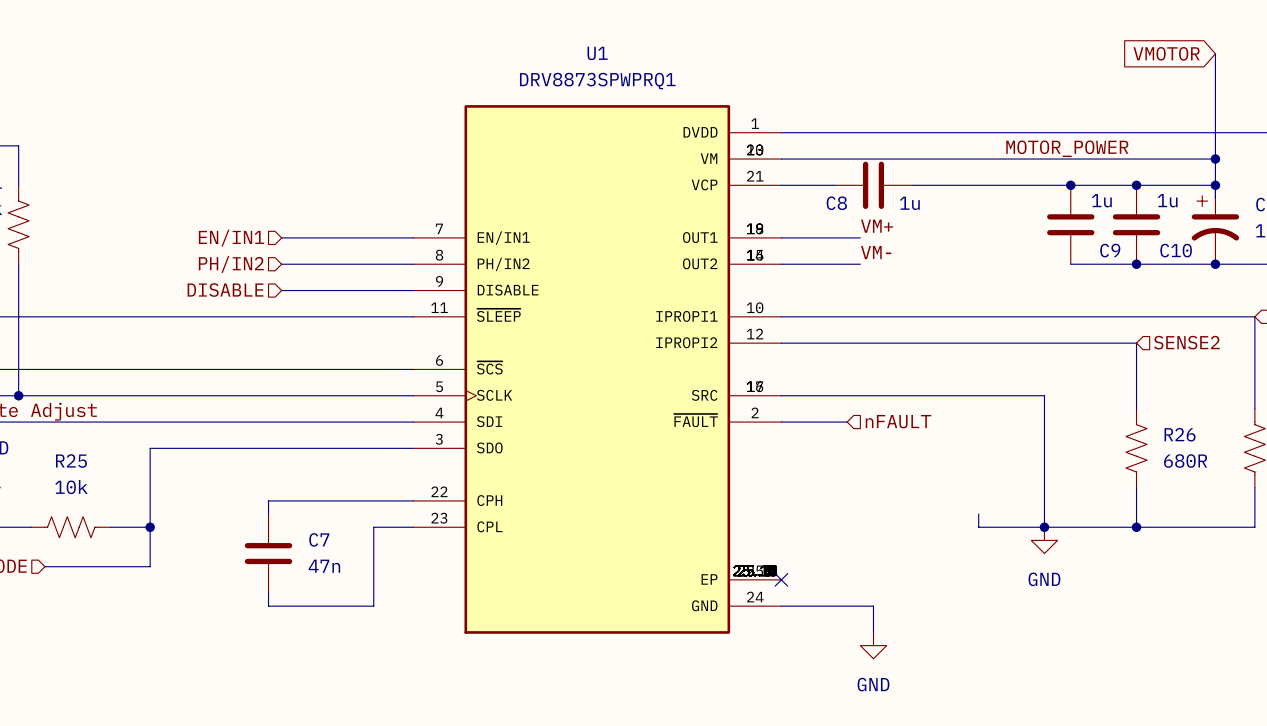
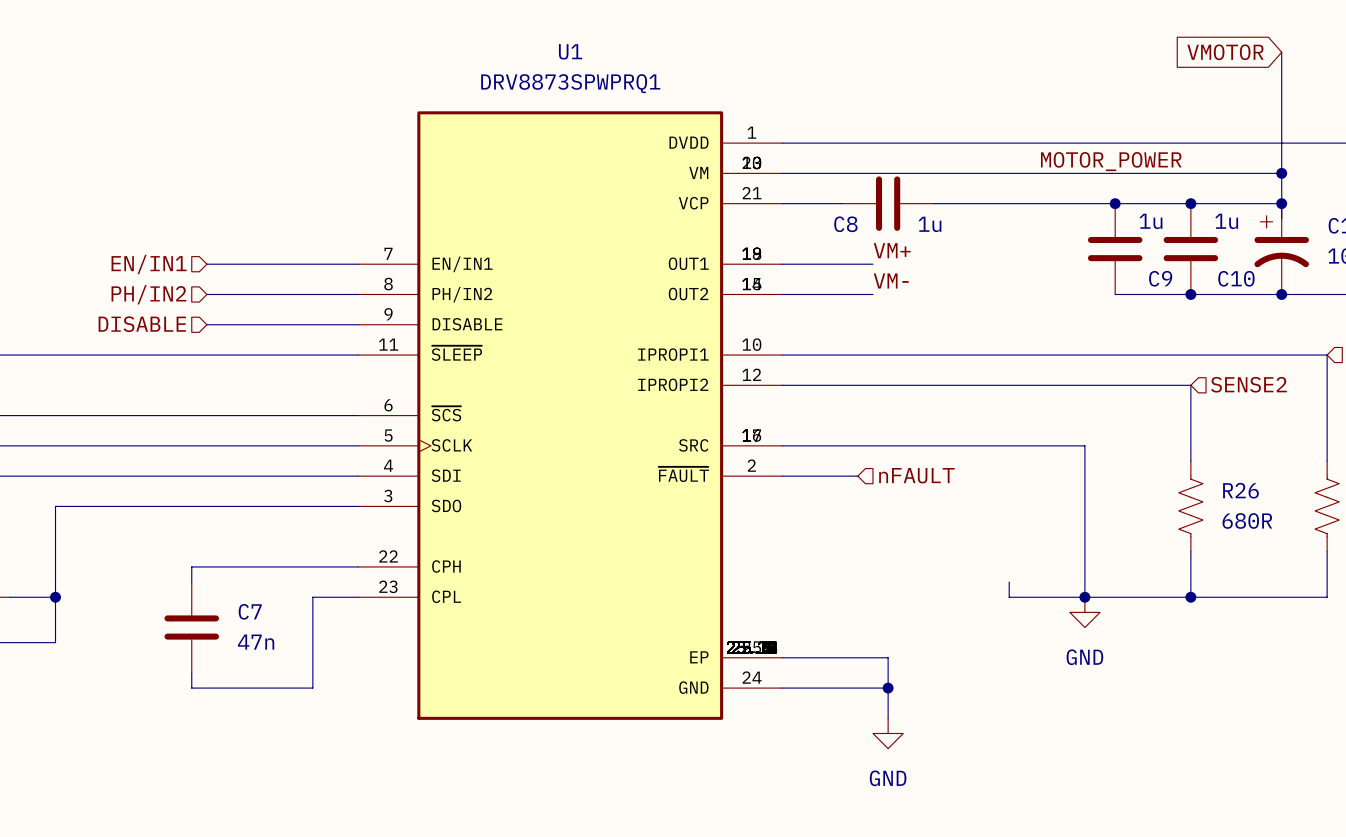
wire: none -> (782, 657) (888, 657) (888, 688)
no-connect mark: (781, 579) -> none
junction: none -> (888, 688)

